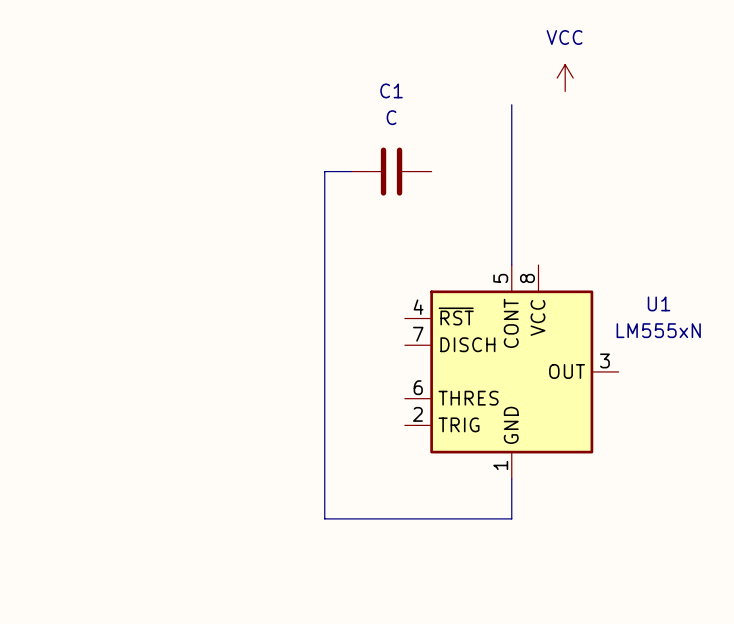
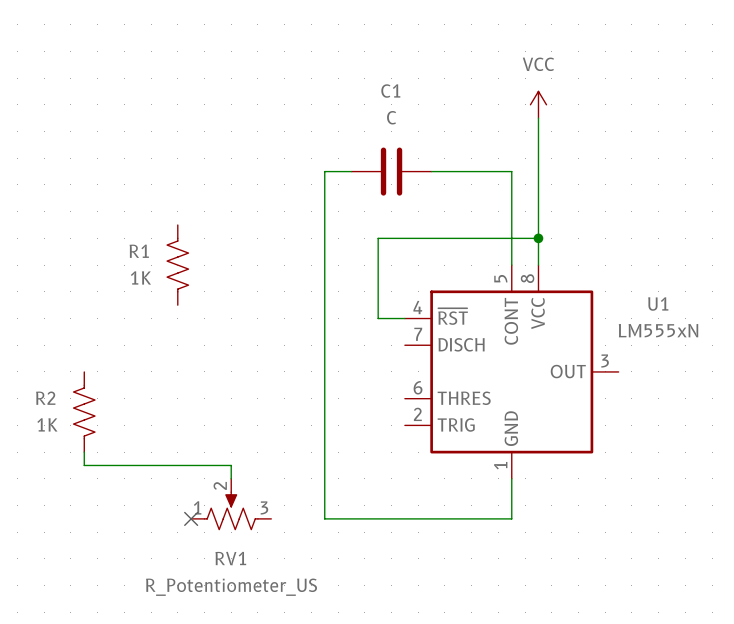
power symbol position: VCC (565, 78) -> VCC (538, 104)
wire: (511, 104) (511, 171) -> (431, 171) (511, 171)
wire: none -> (538, 118) (538, 265)
wire: none -> (538, 238) (378, 238) (378, 318) (404, 318)
junction: none -> (538, 238)
R1: none -> 1K (177, 265)
R2: none -> 1K (84, 412)
wire: none -> (84, 452) (84, 465) (231, 465) (231, 478)
RV1: none -> R_Potentiometer_US (231, 504)
no-connect mark: none -> (191, 518)

